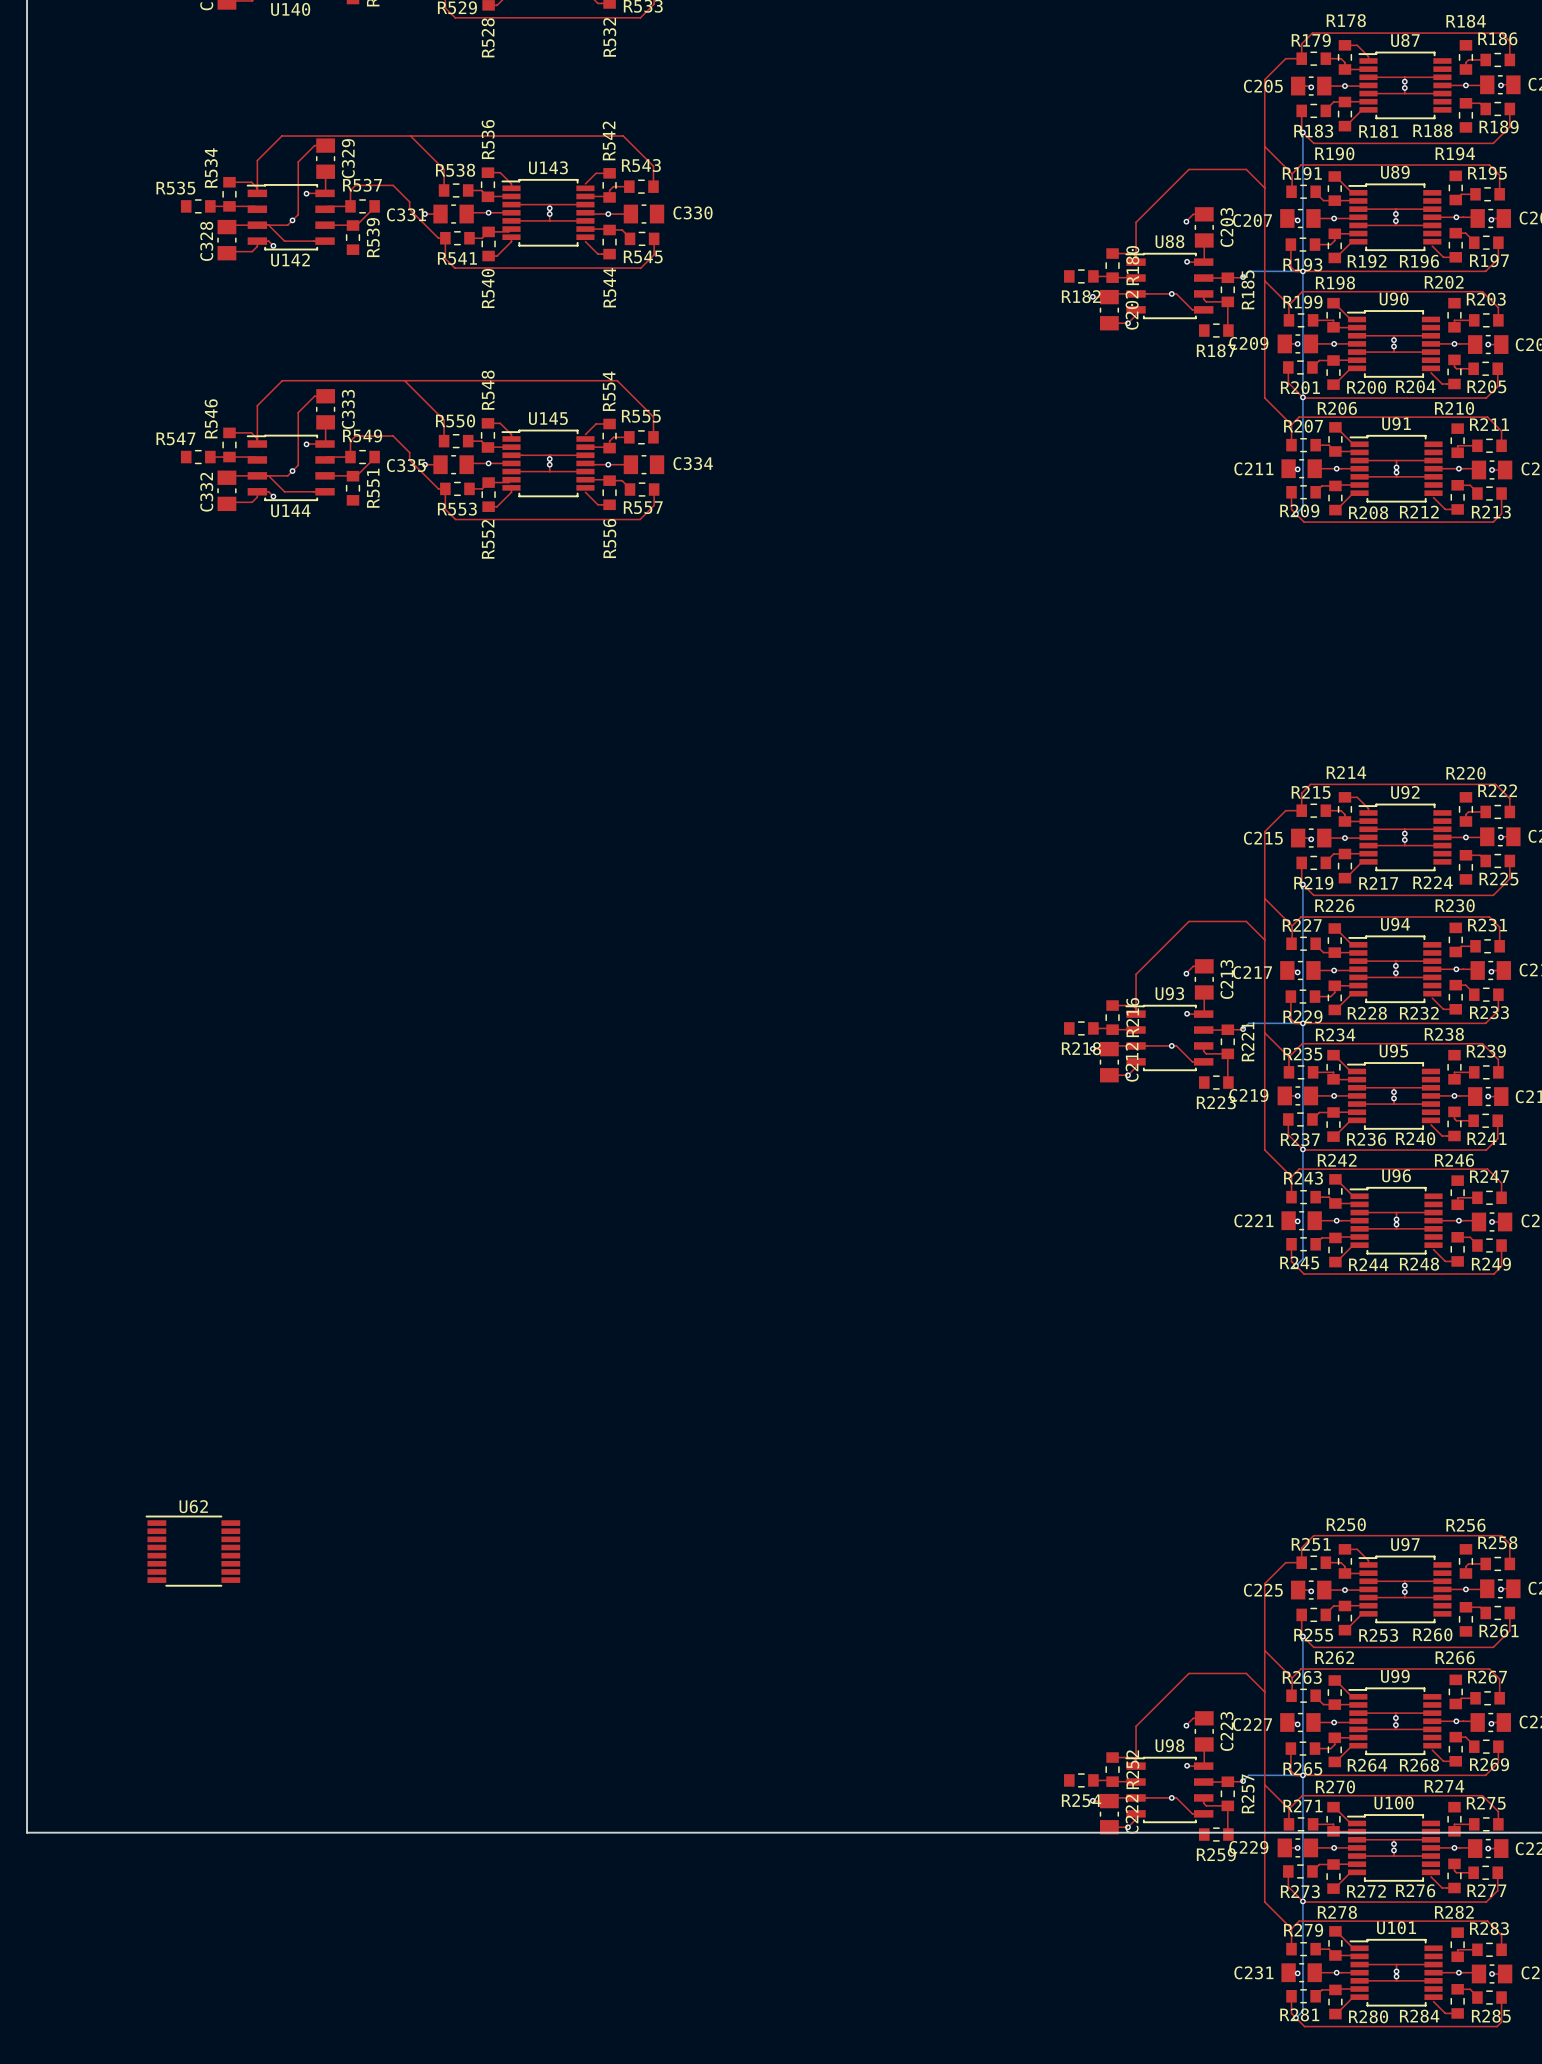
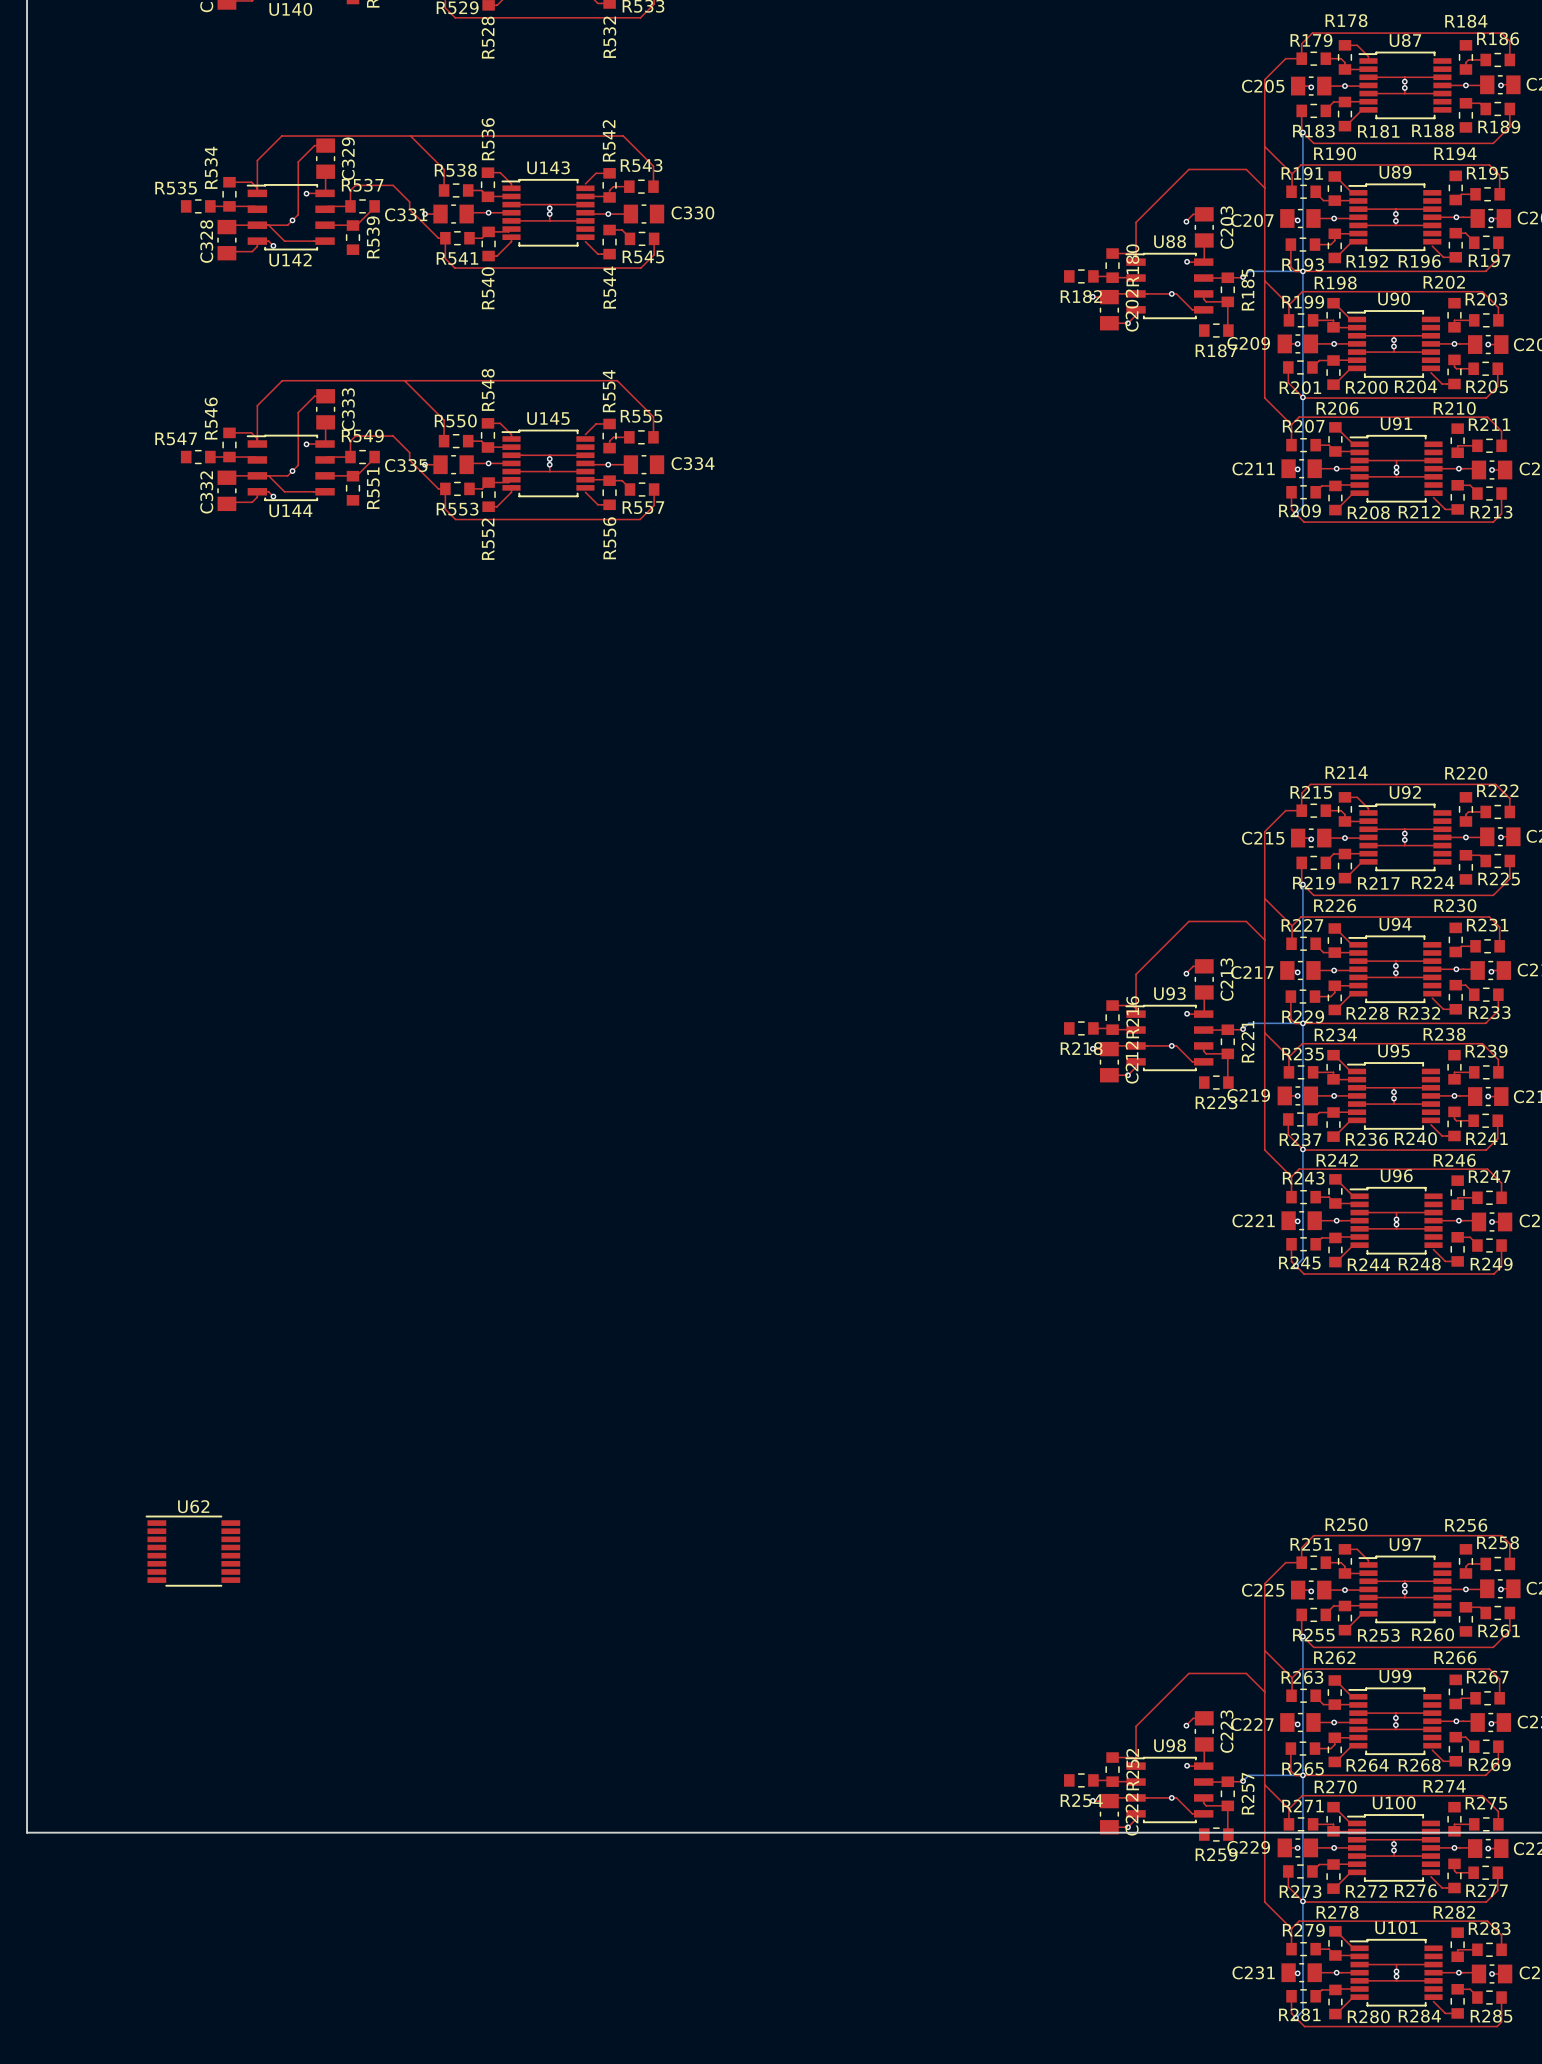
top track: (585, 229) (609, 229) -> none
top track: (585, 447) (609, 448) -> none

